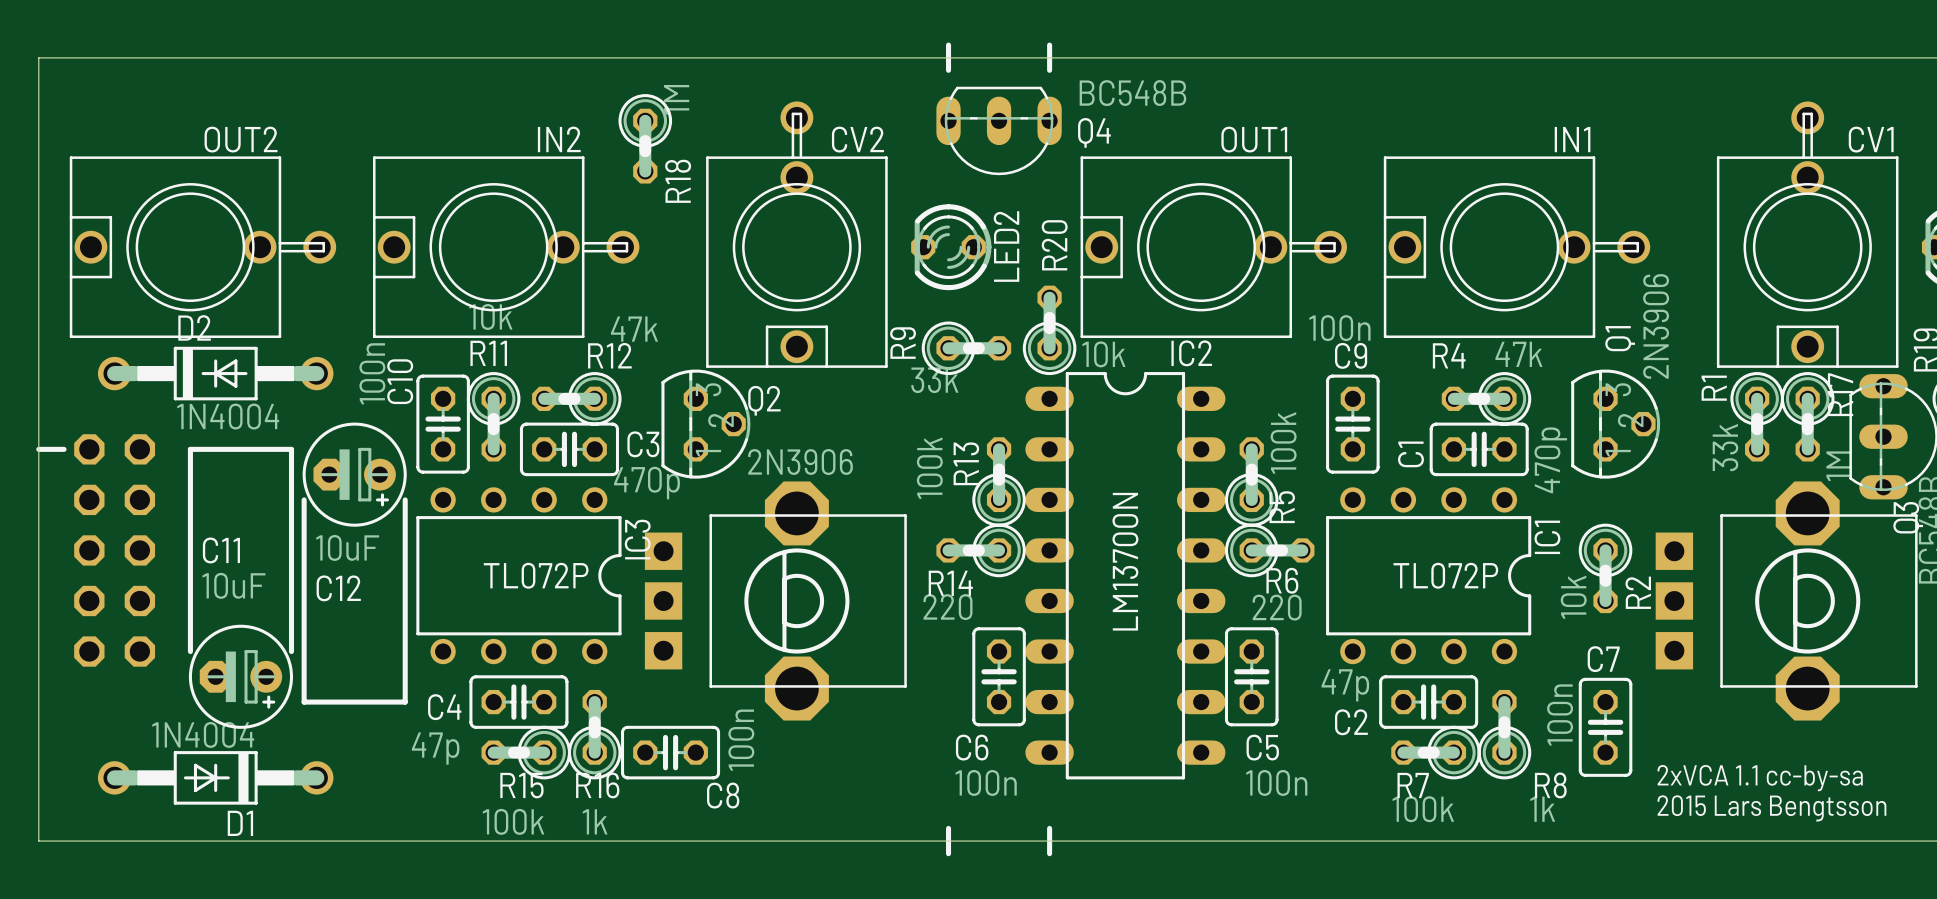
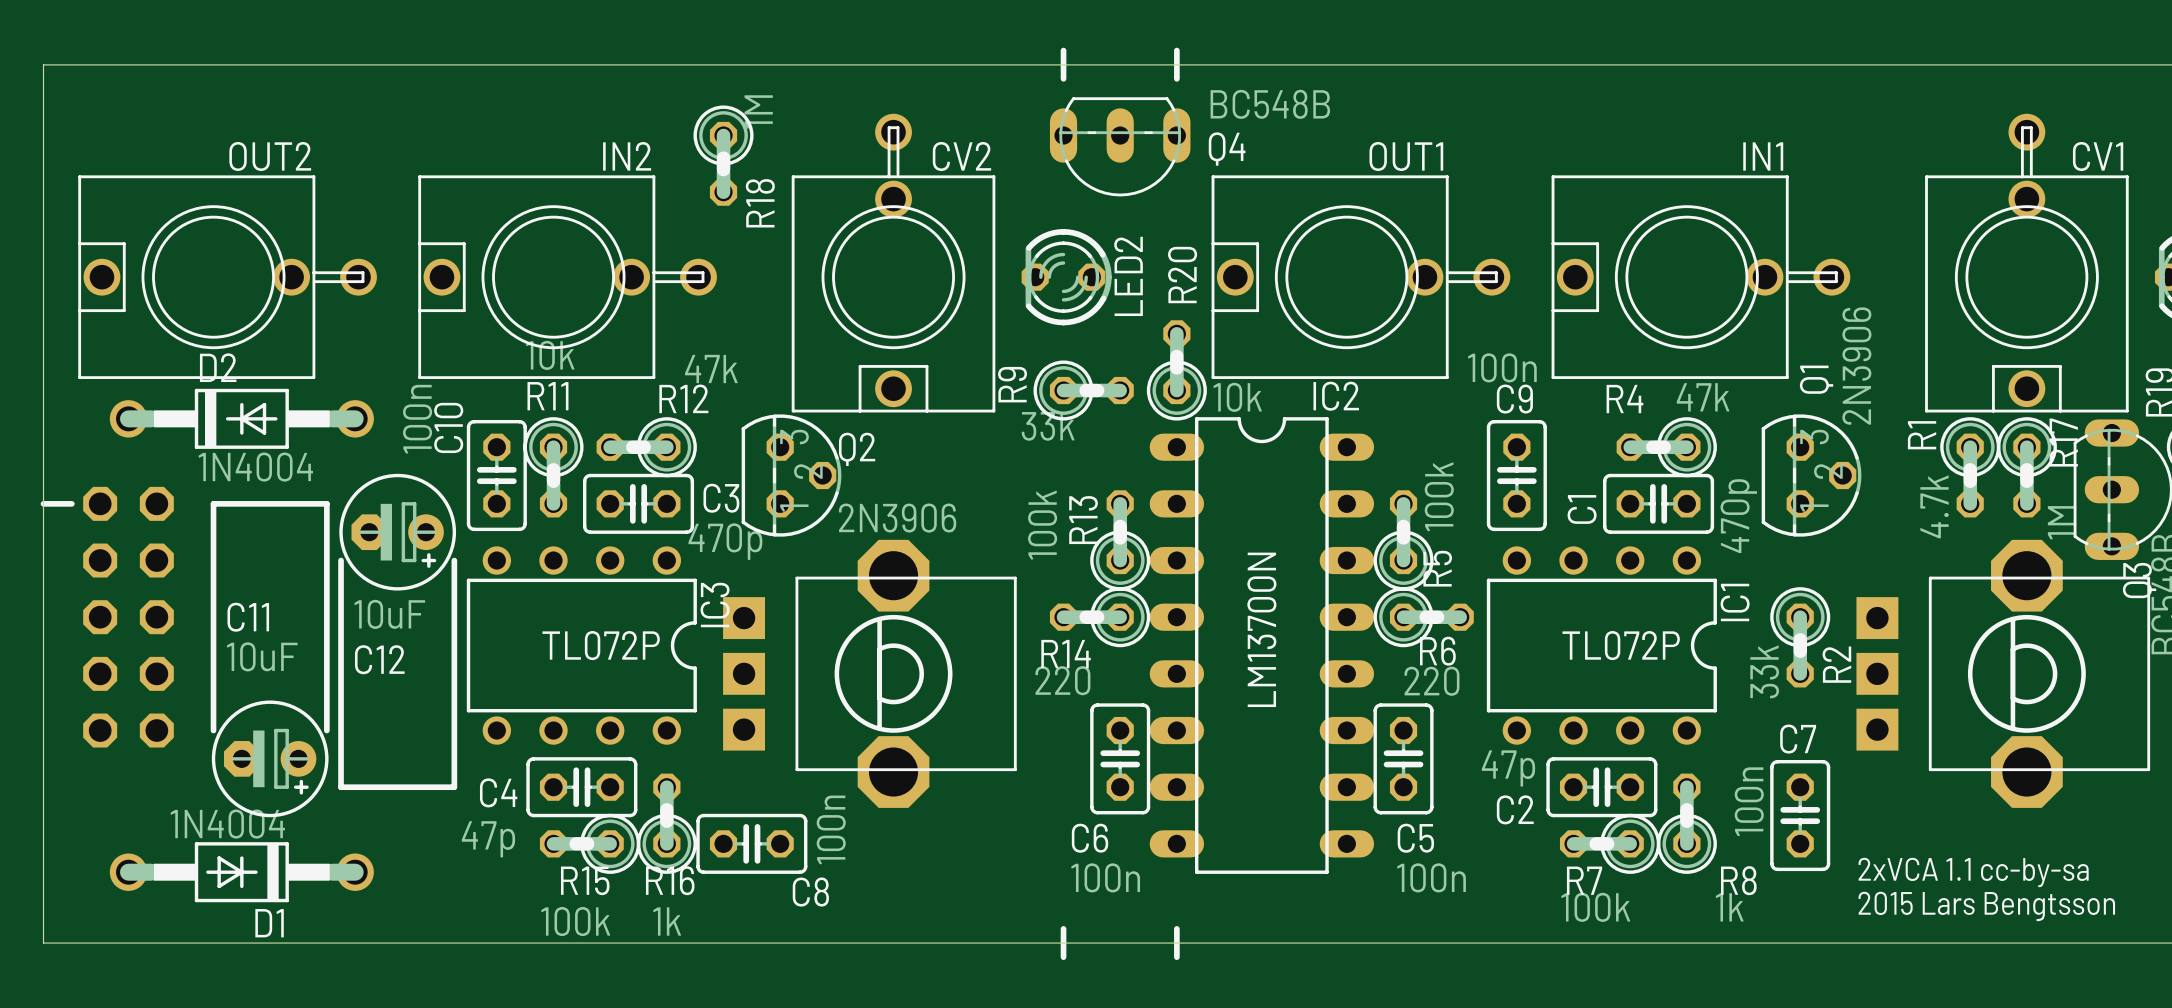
R1 value: 33k (1725, 447) -> 4.7k (1934, 506)
R2 value: 10k (1573, 597) -> 33k (1764, 671)

